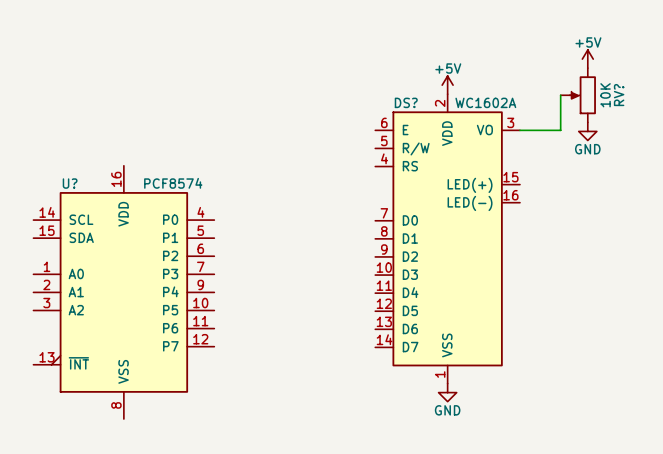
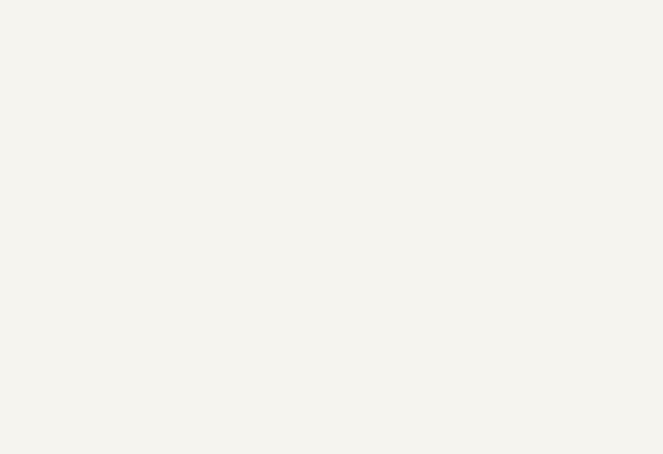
power symbol: +5V (587, 59) -> none
power symbol: +5V (447, 85) -> none
wire: (560, 95) (560, 130) (519, 130) -> none
RV?: 10K (578, 95) -> none
power symbol: GND (587, 131) -> none
DS?: WC1602A (447, 238) -> none
U?: PCF8574 (123, 292) -> none
power symbol: GND (447, 392) -> none

